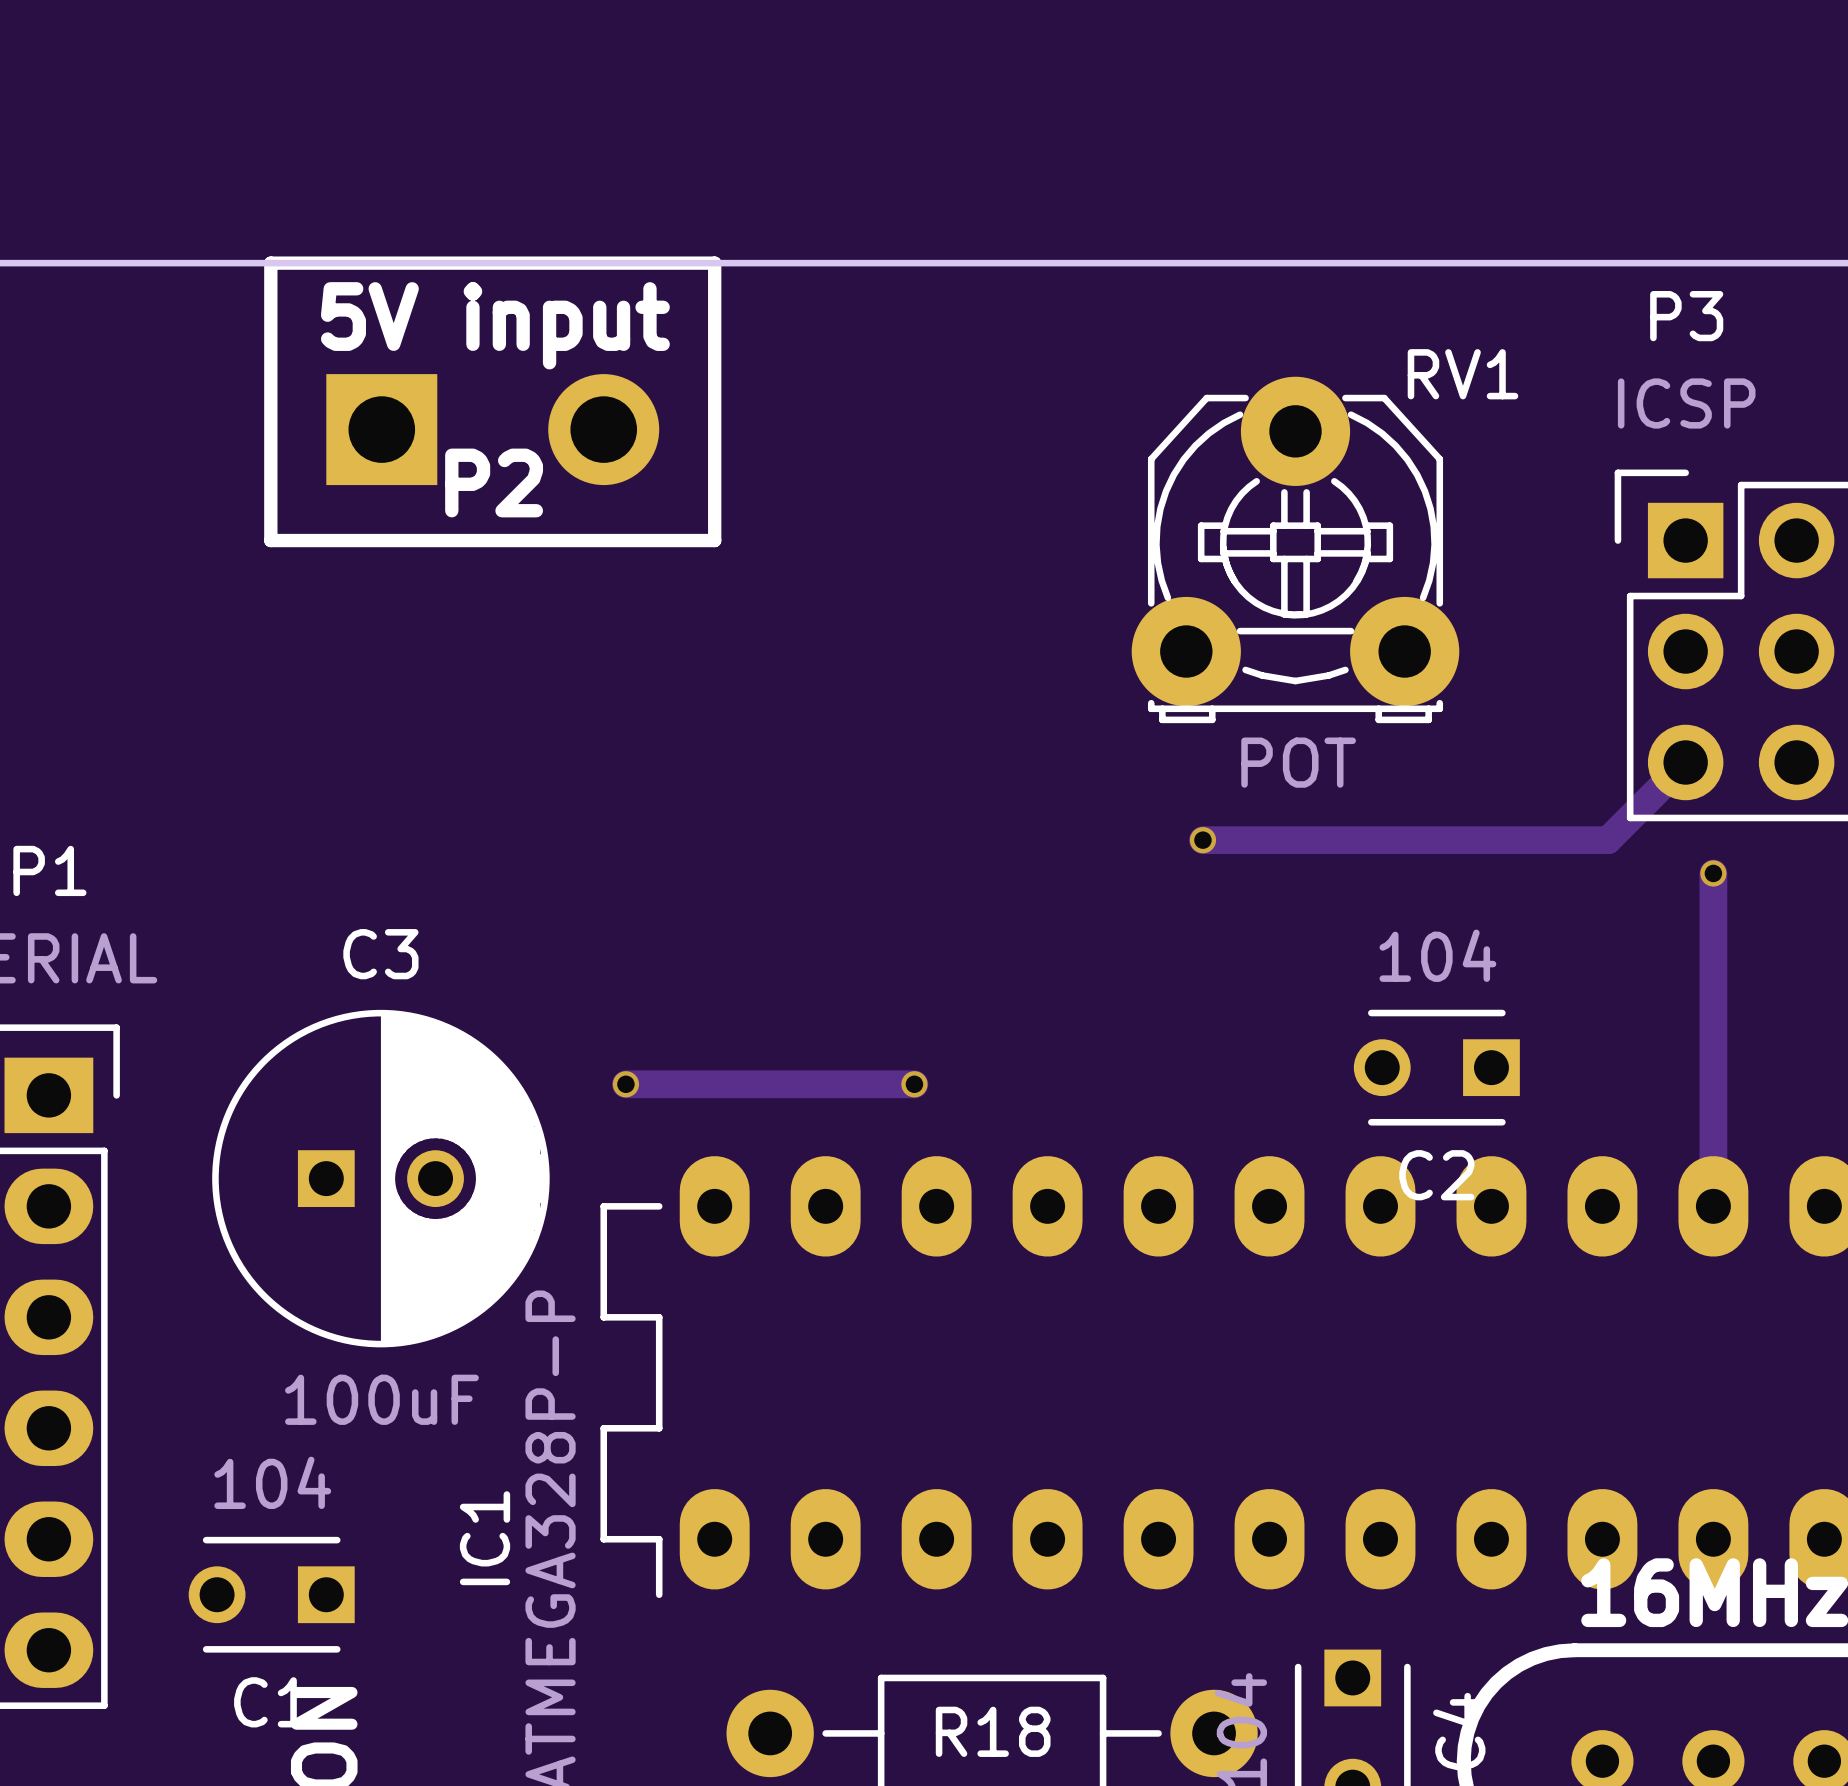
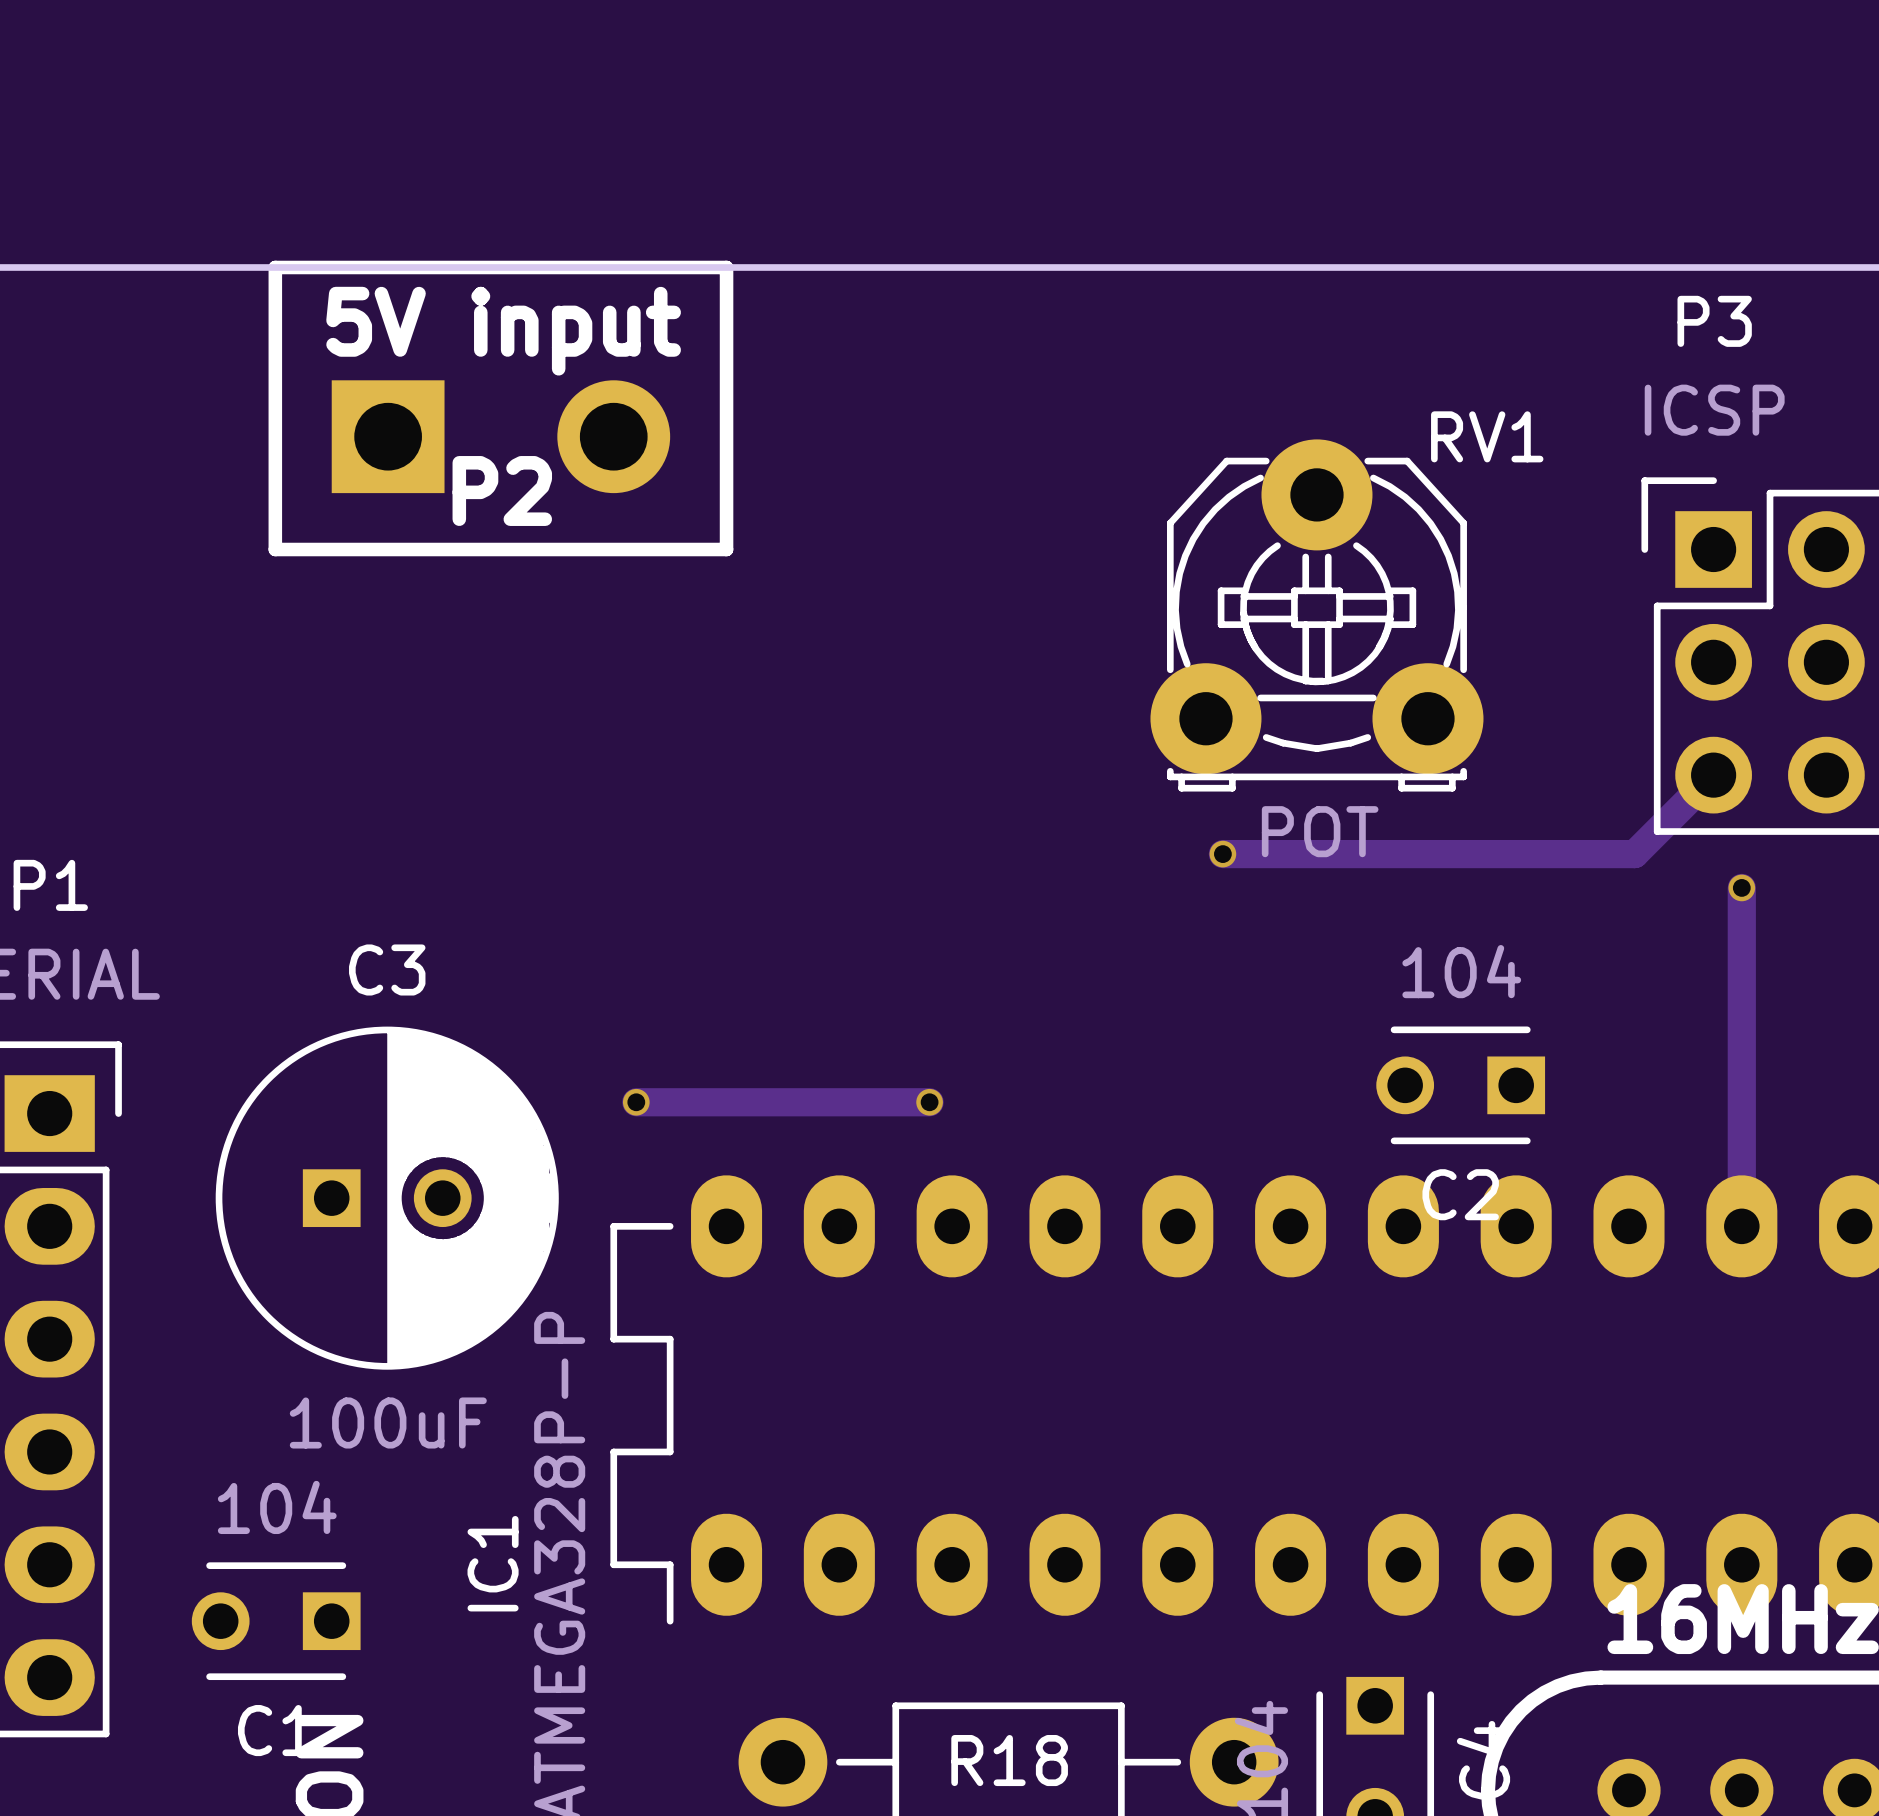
RV1 position: (1295, 549) -> (1316, 615)

